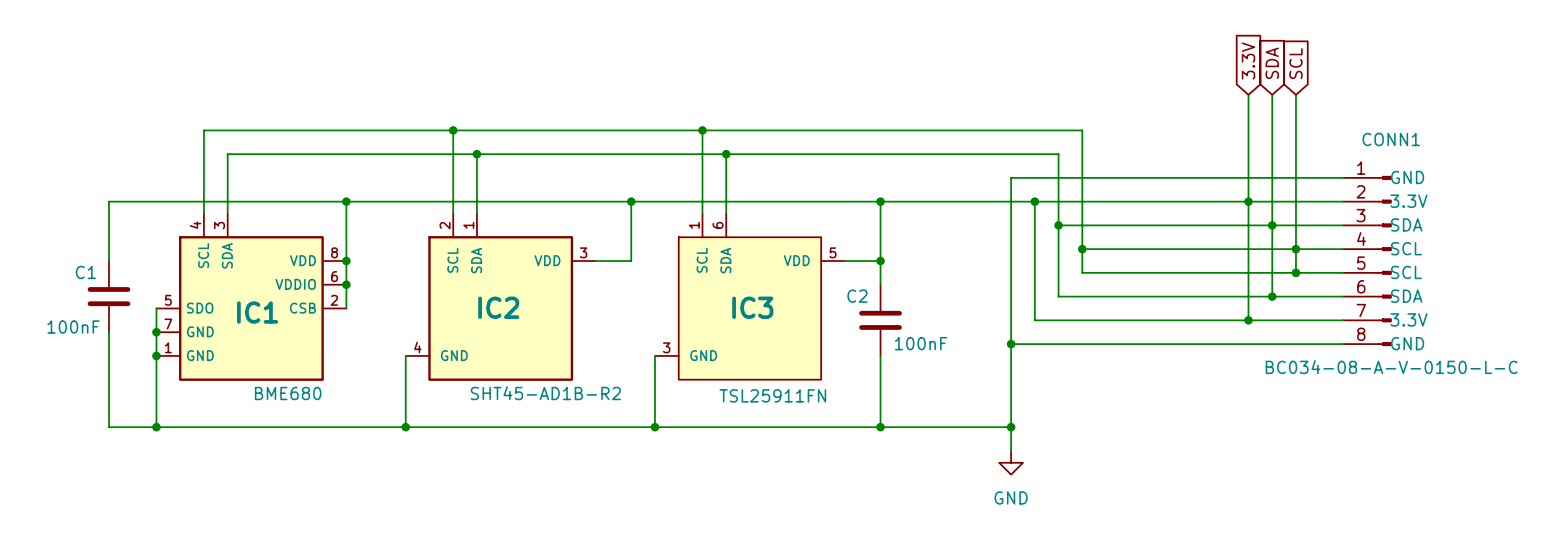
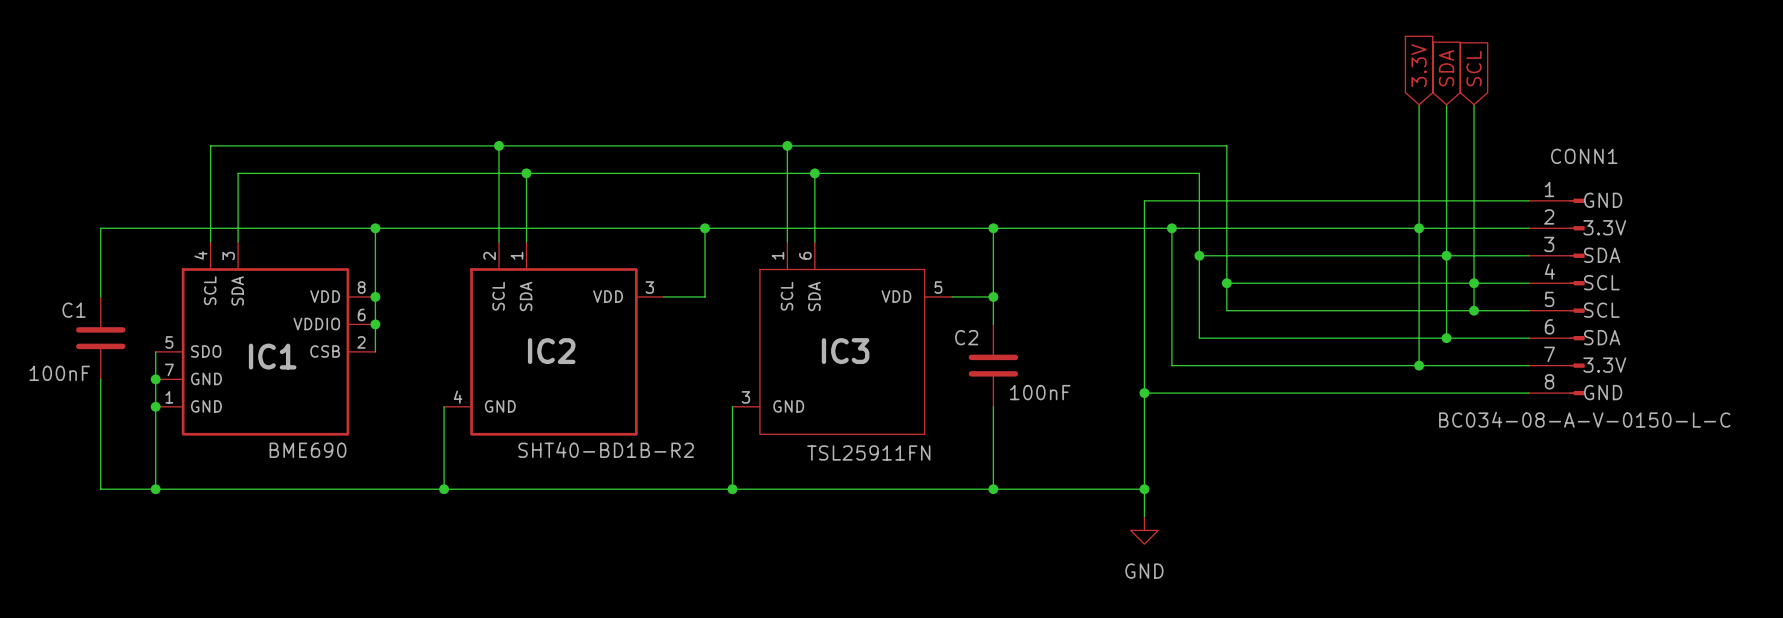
IC1 value: BME680 (288, 393) -> BME690 (308, 450)
IC2 value: SHT45-AD1B-R2 (545, 393) -> SHT40-BD1B-R2 (606, 449)

